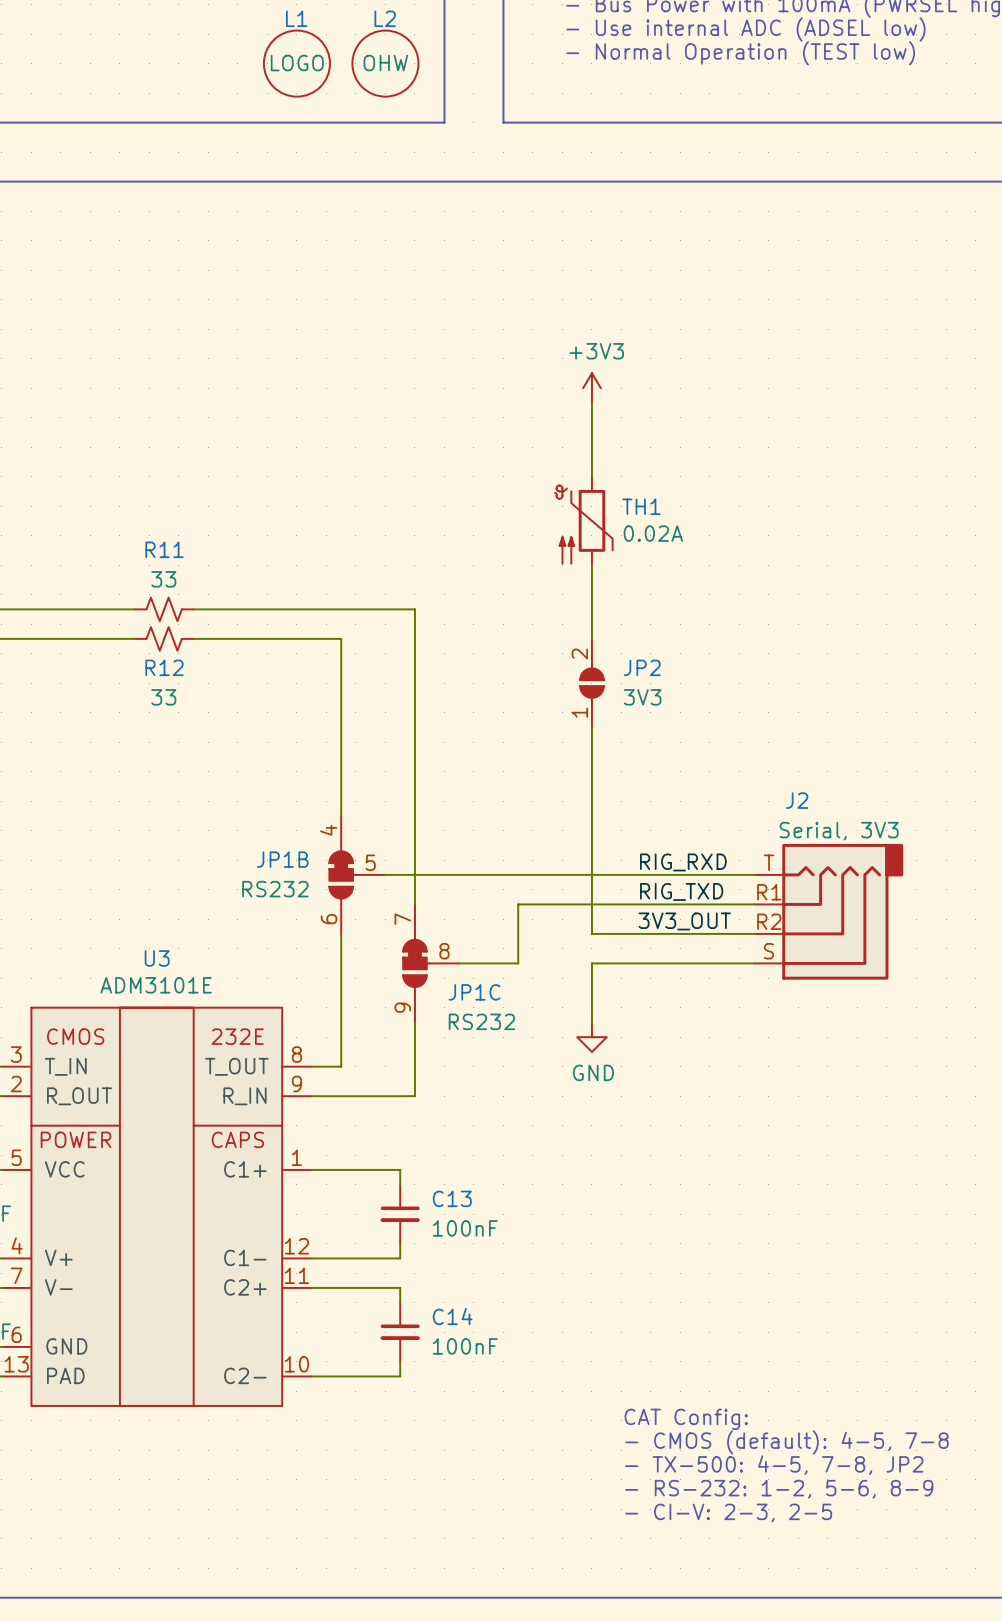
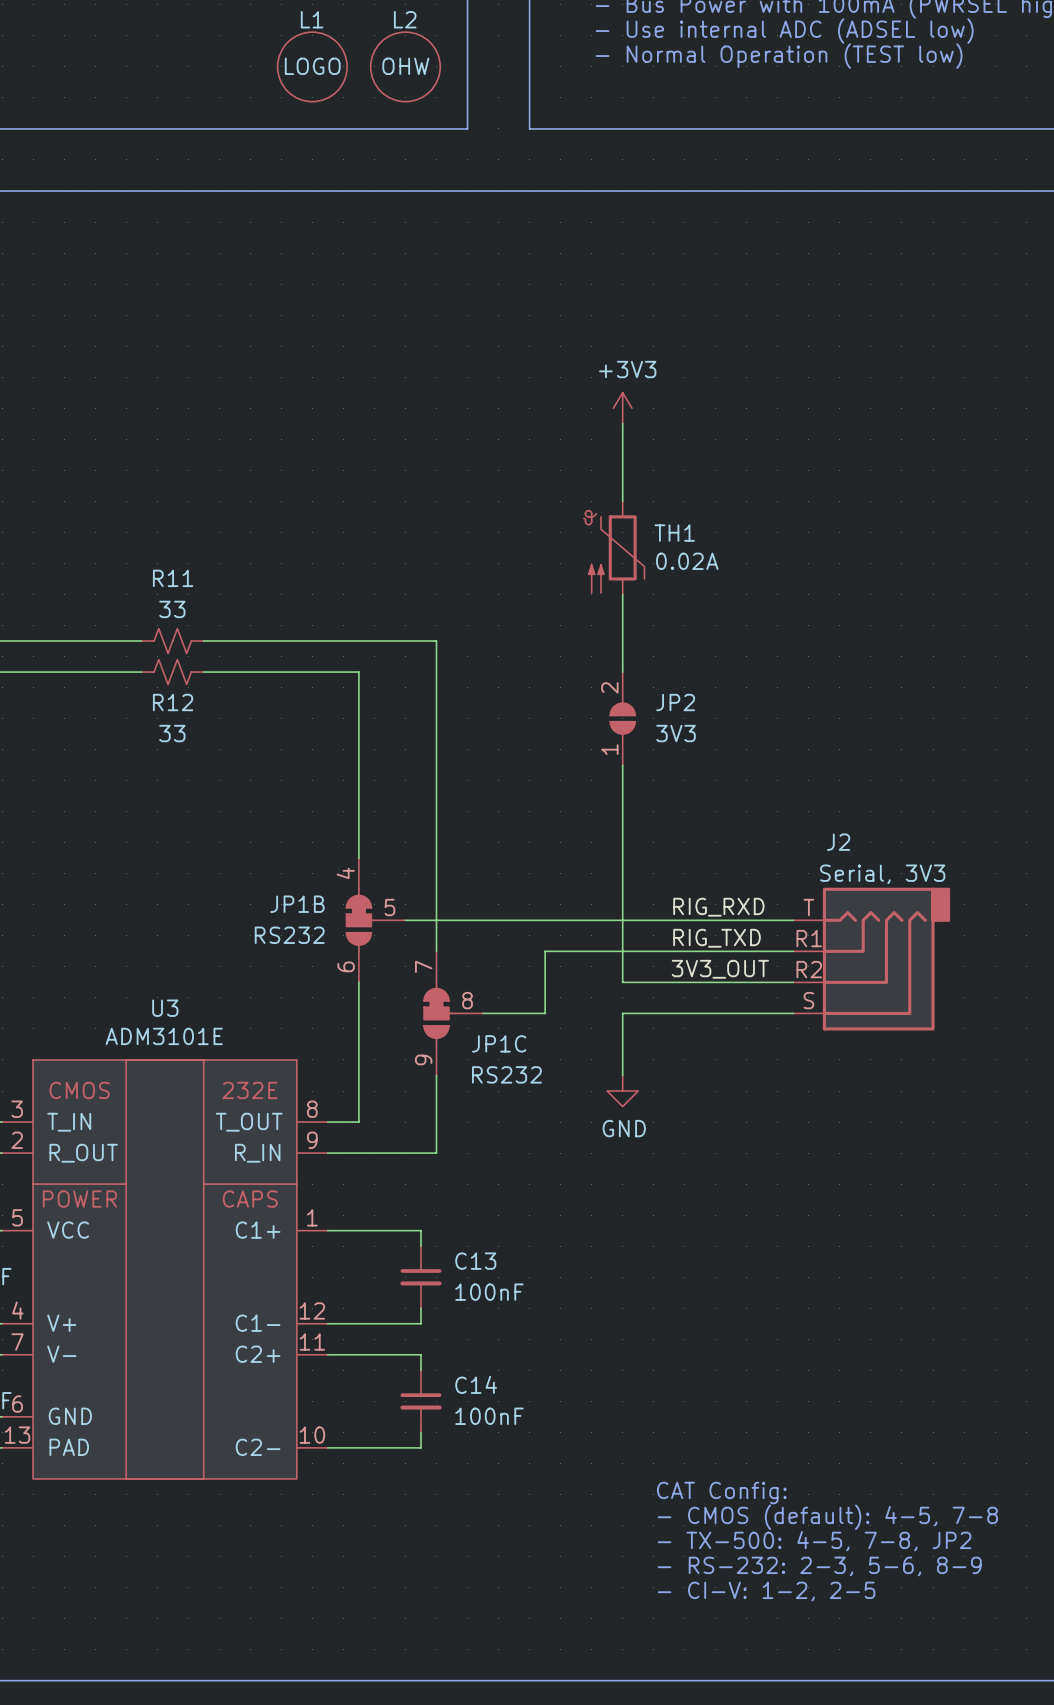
text: - RS-232: 1-2, 5-6, 8-9 (779, 1489) -> - RS-232: 2-3, 5-6, 8-9 (819, 1566)
text: - CI-V: 2-3, 2-5 (728, 1512) -> - CI-V: 1-2, 2-5 (766, 1591)

